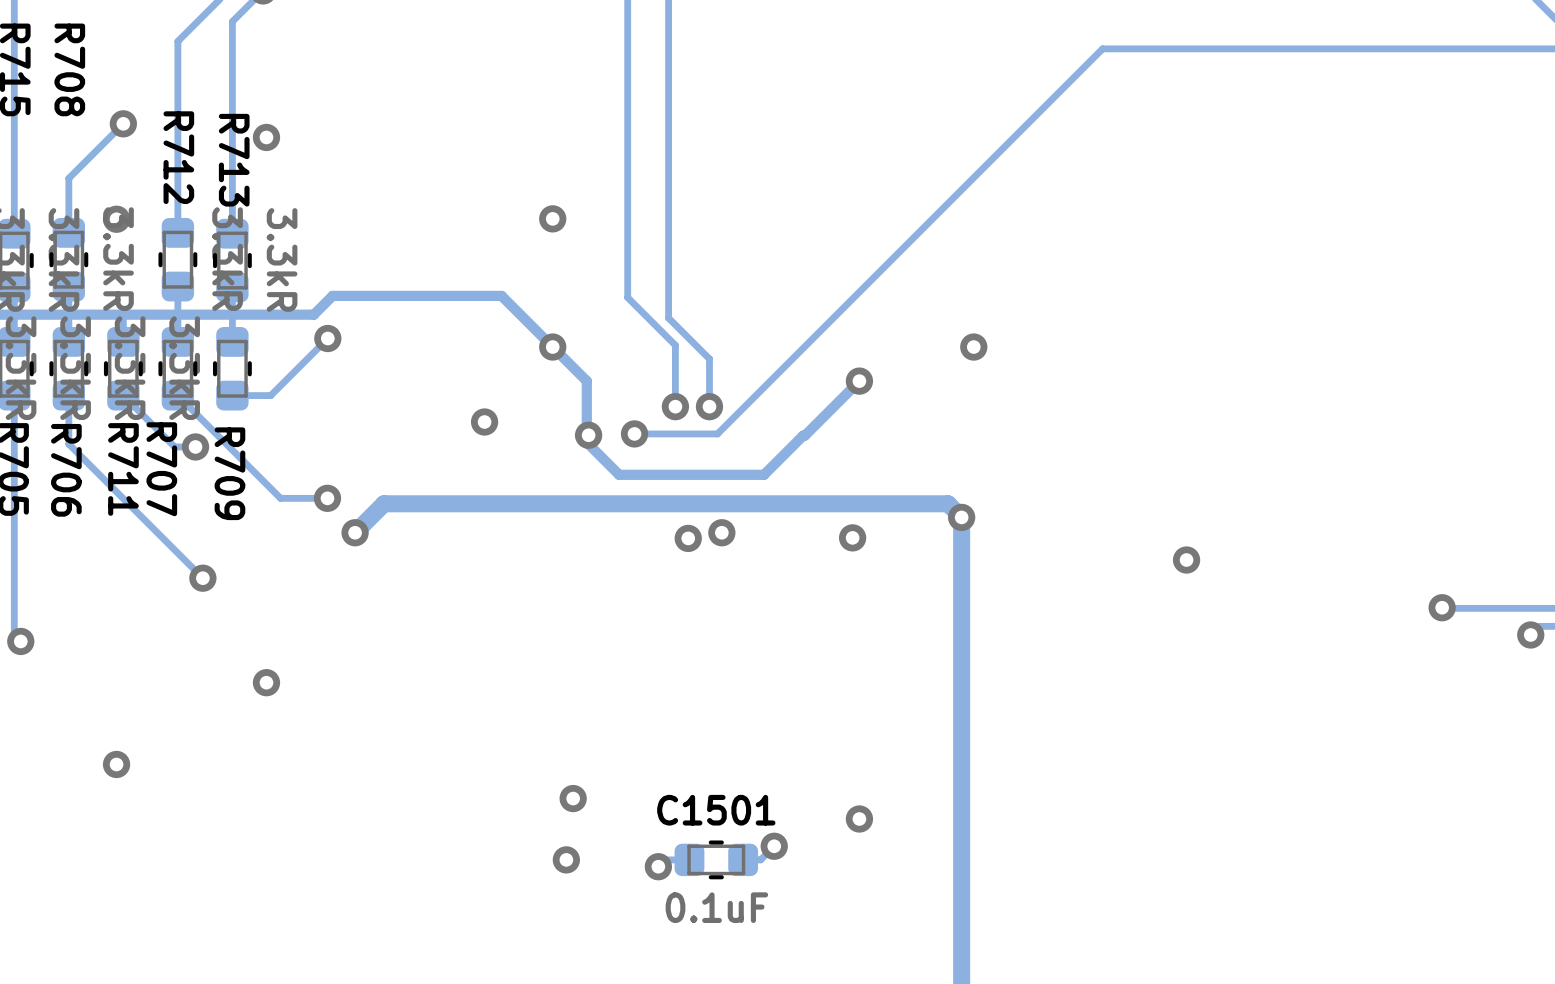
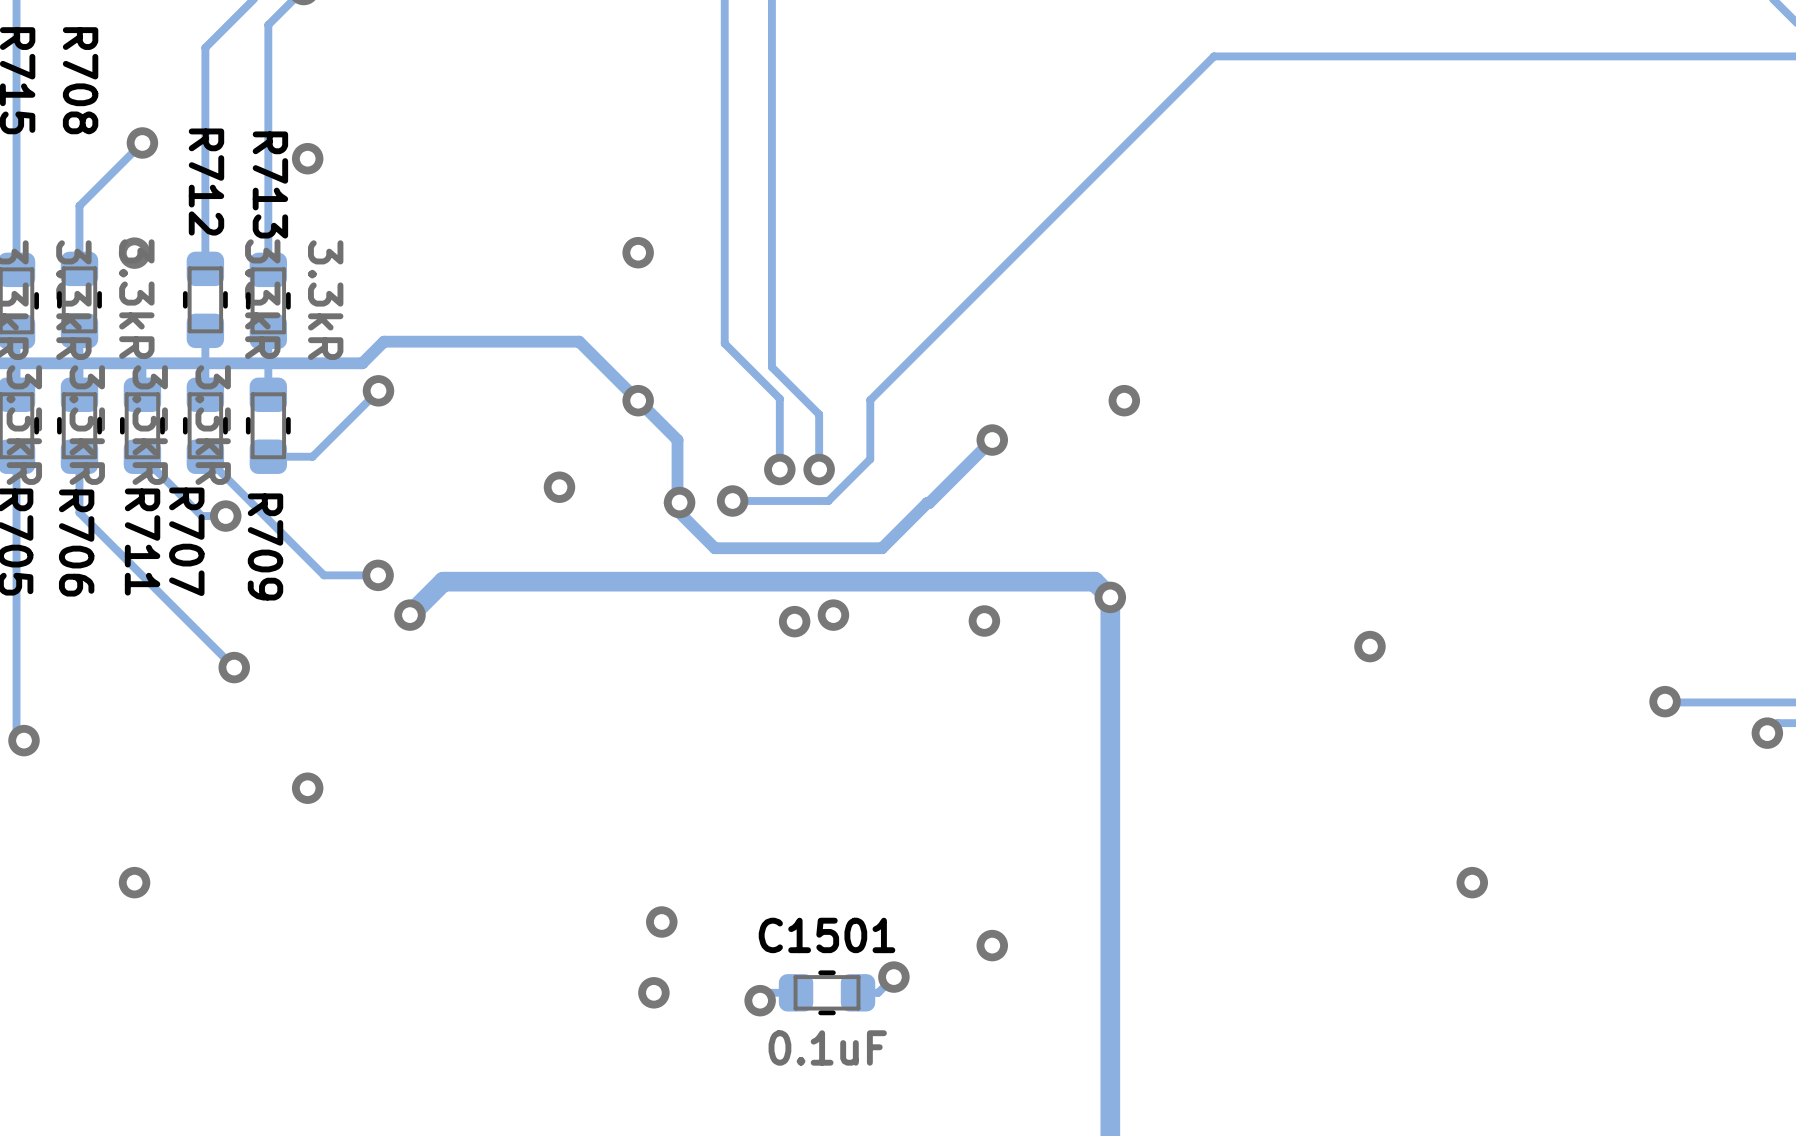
track: (1102, 48) (753, 397) -> (1273, 56) (1214, 56) (870, 400) (870, 459)
via: none -> (1472, 882)

